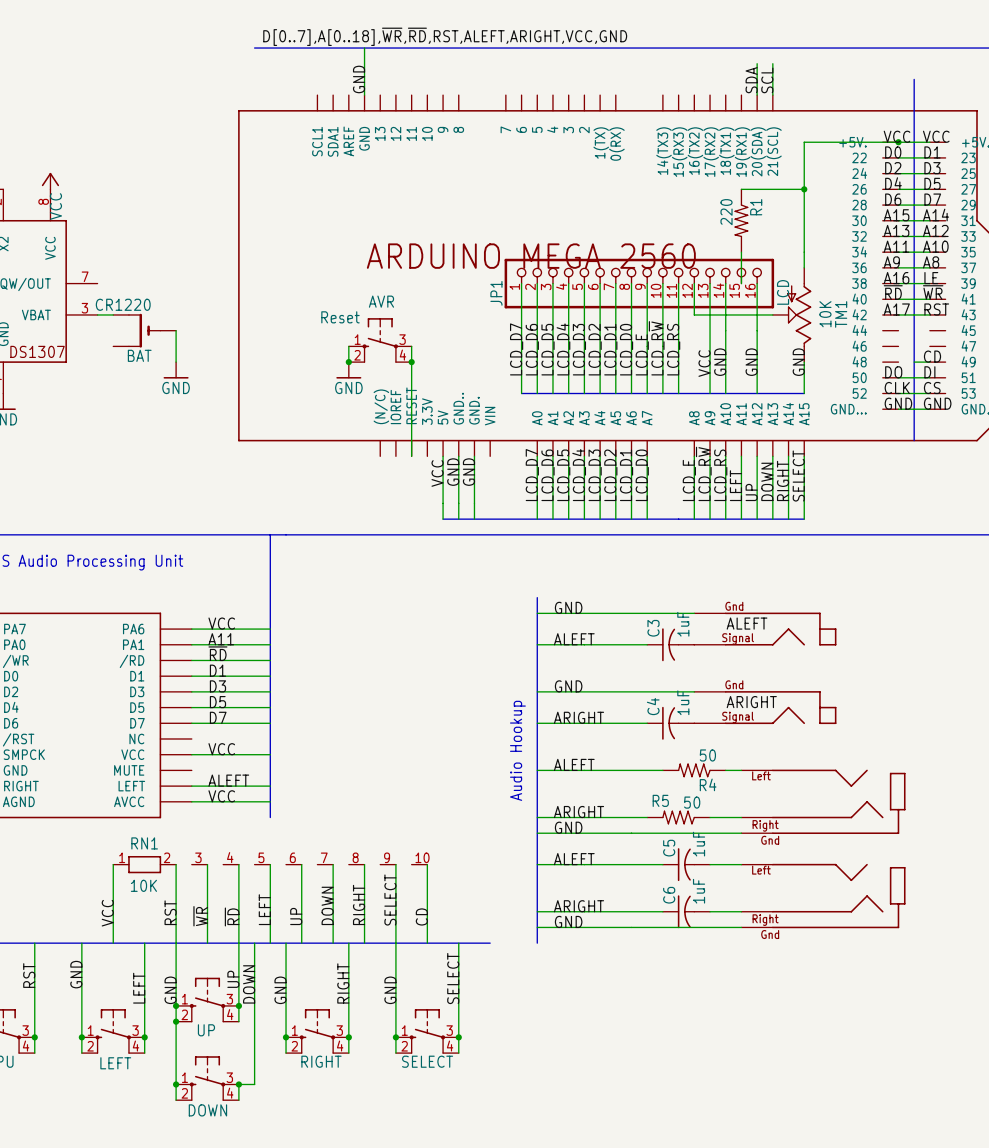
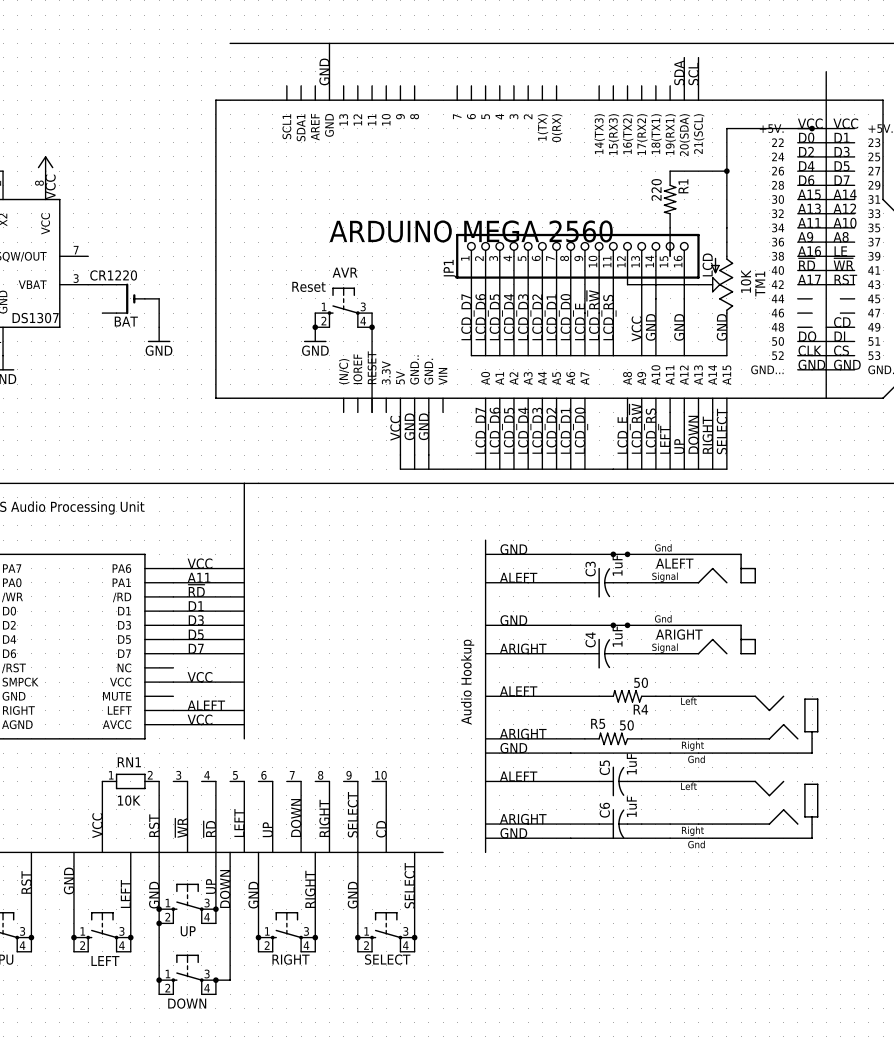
label: D[0..7],A[0..18],~{WR},~{RD},RST,ALEFT,ARIGHT,VCC,GND (445, 36) -> none
junction: none -> (613, 554)
junction: none -> (627, 554)
junction: none -> (613, 625)
junction: none -> (627, 625)

